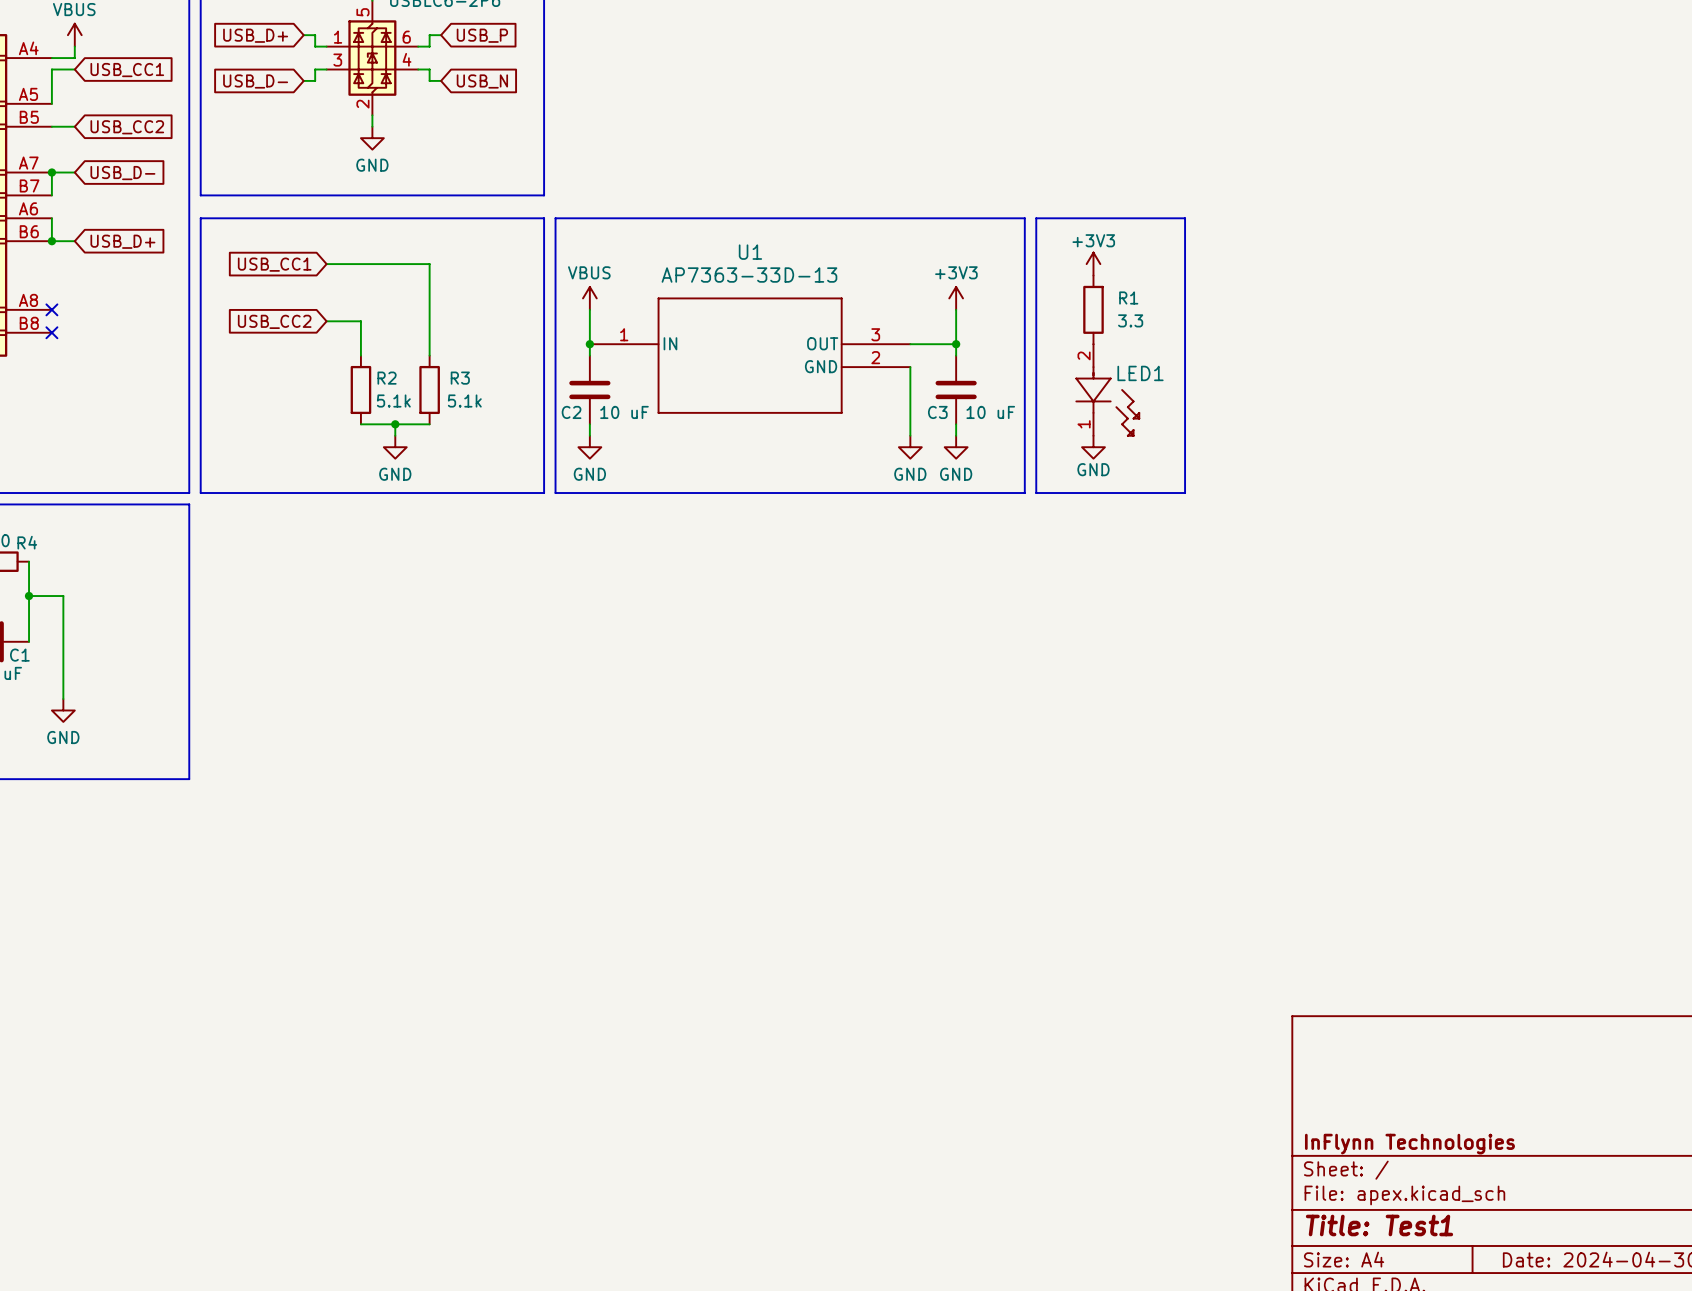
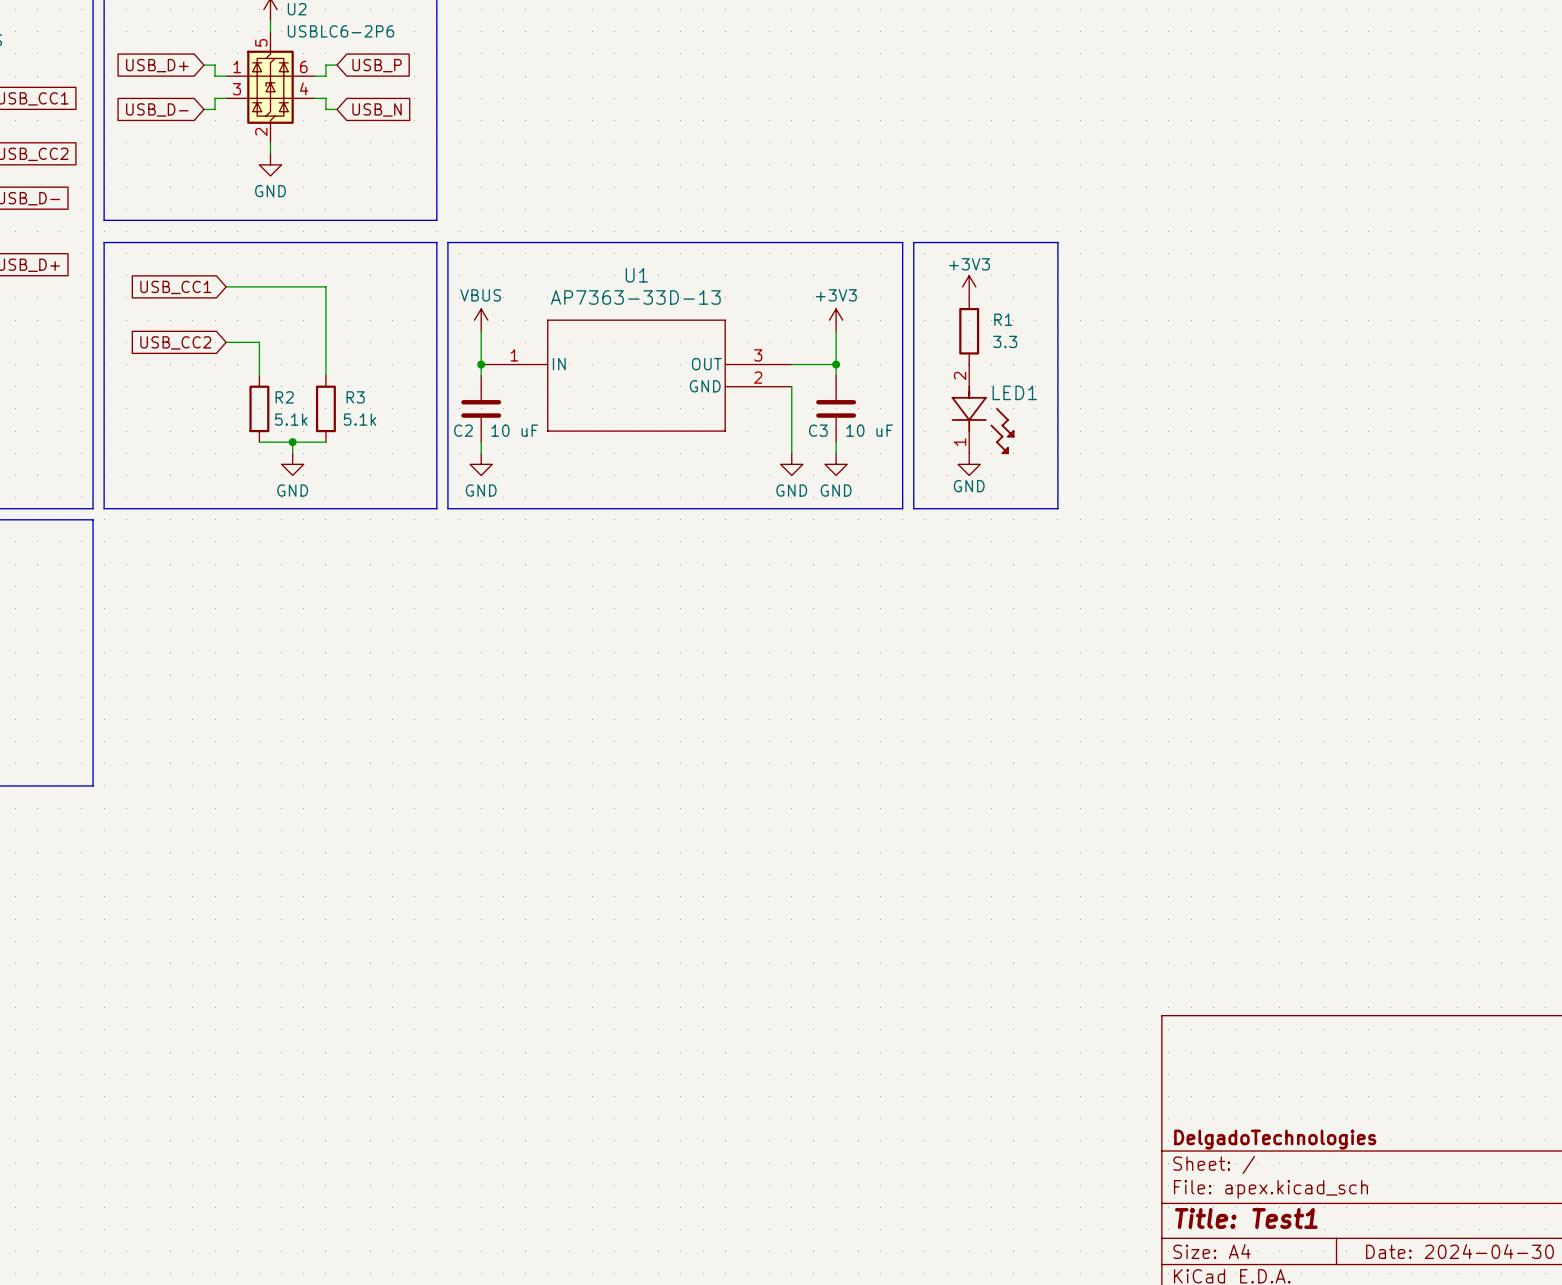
title block: InFlynn Technologies (1409, 1144) -> DelgadoTechnologies (1275, 1139)

